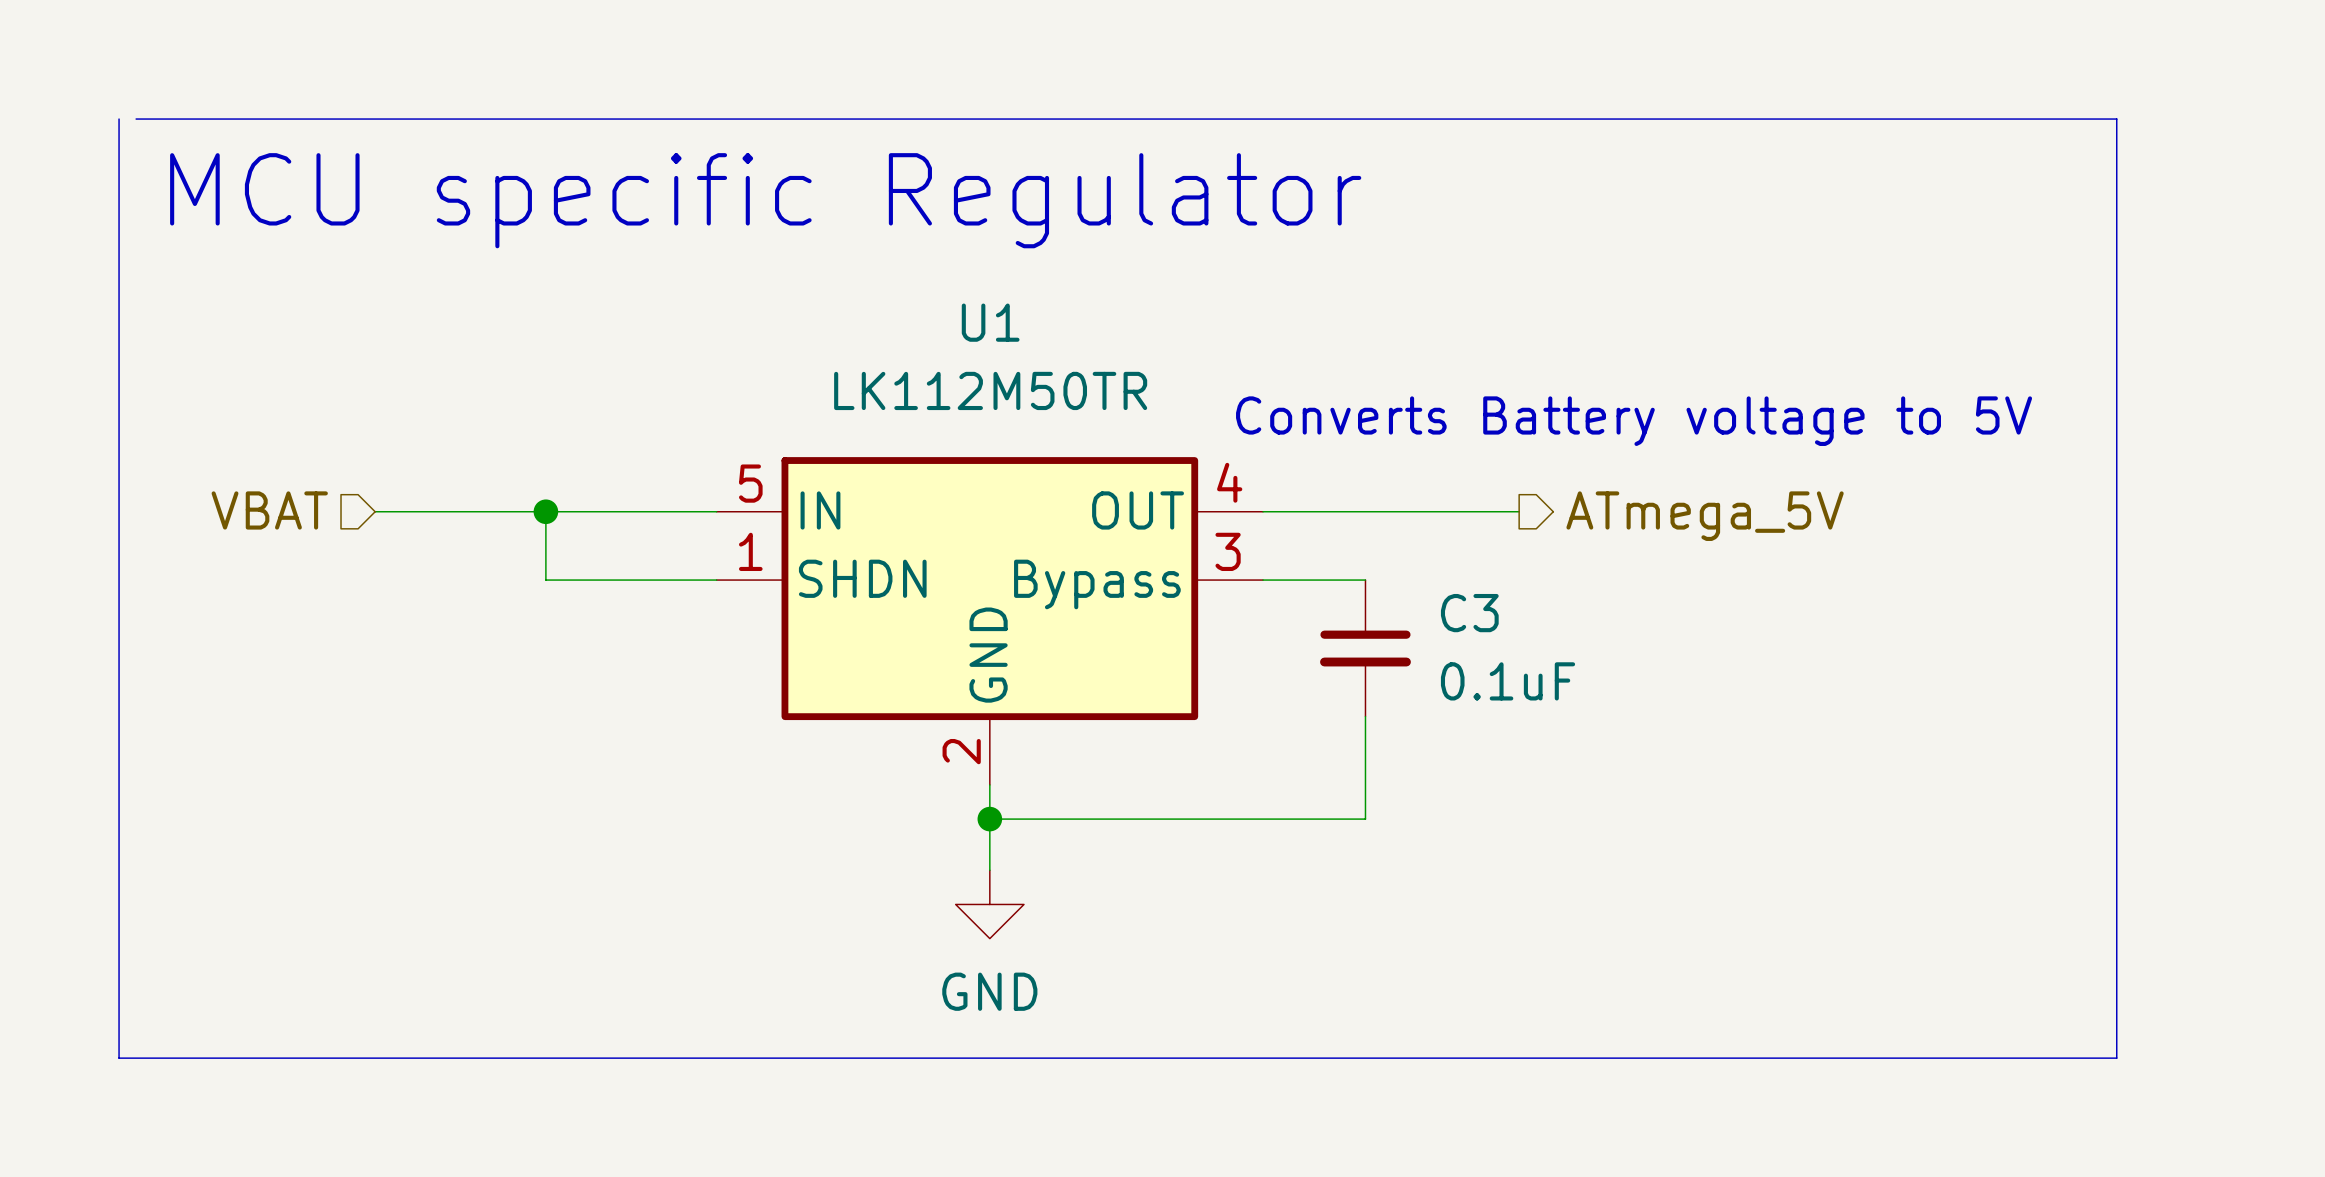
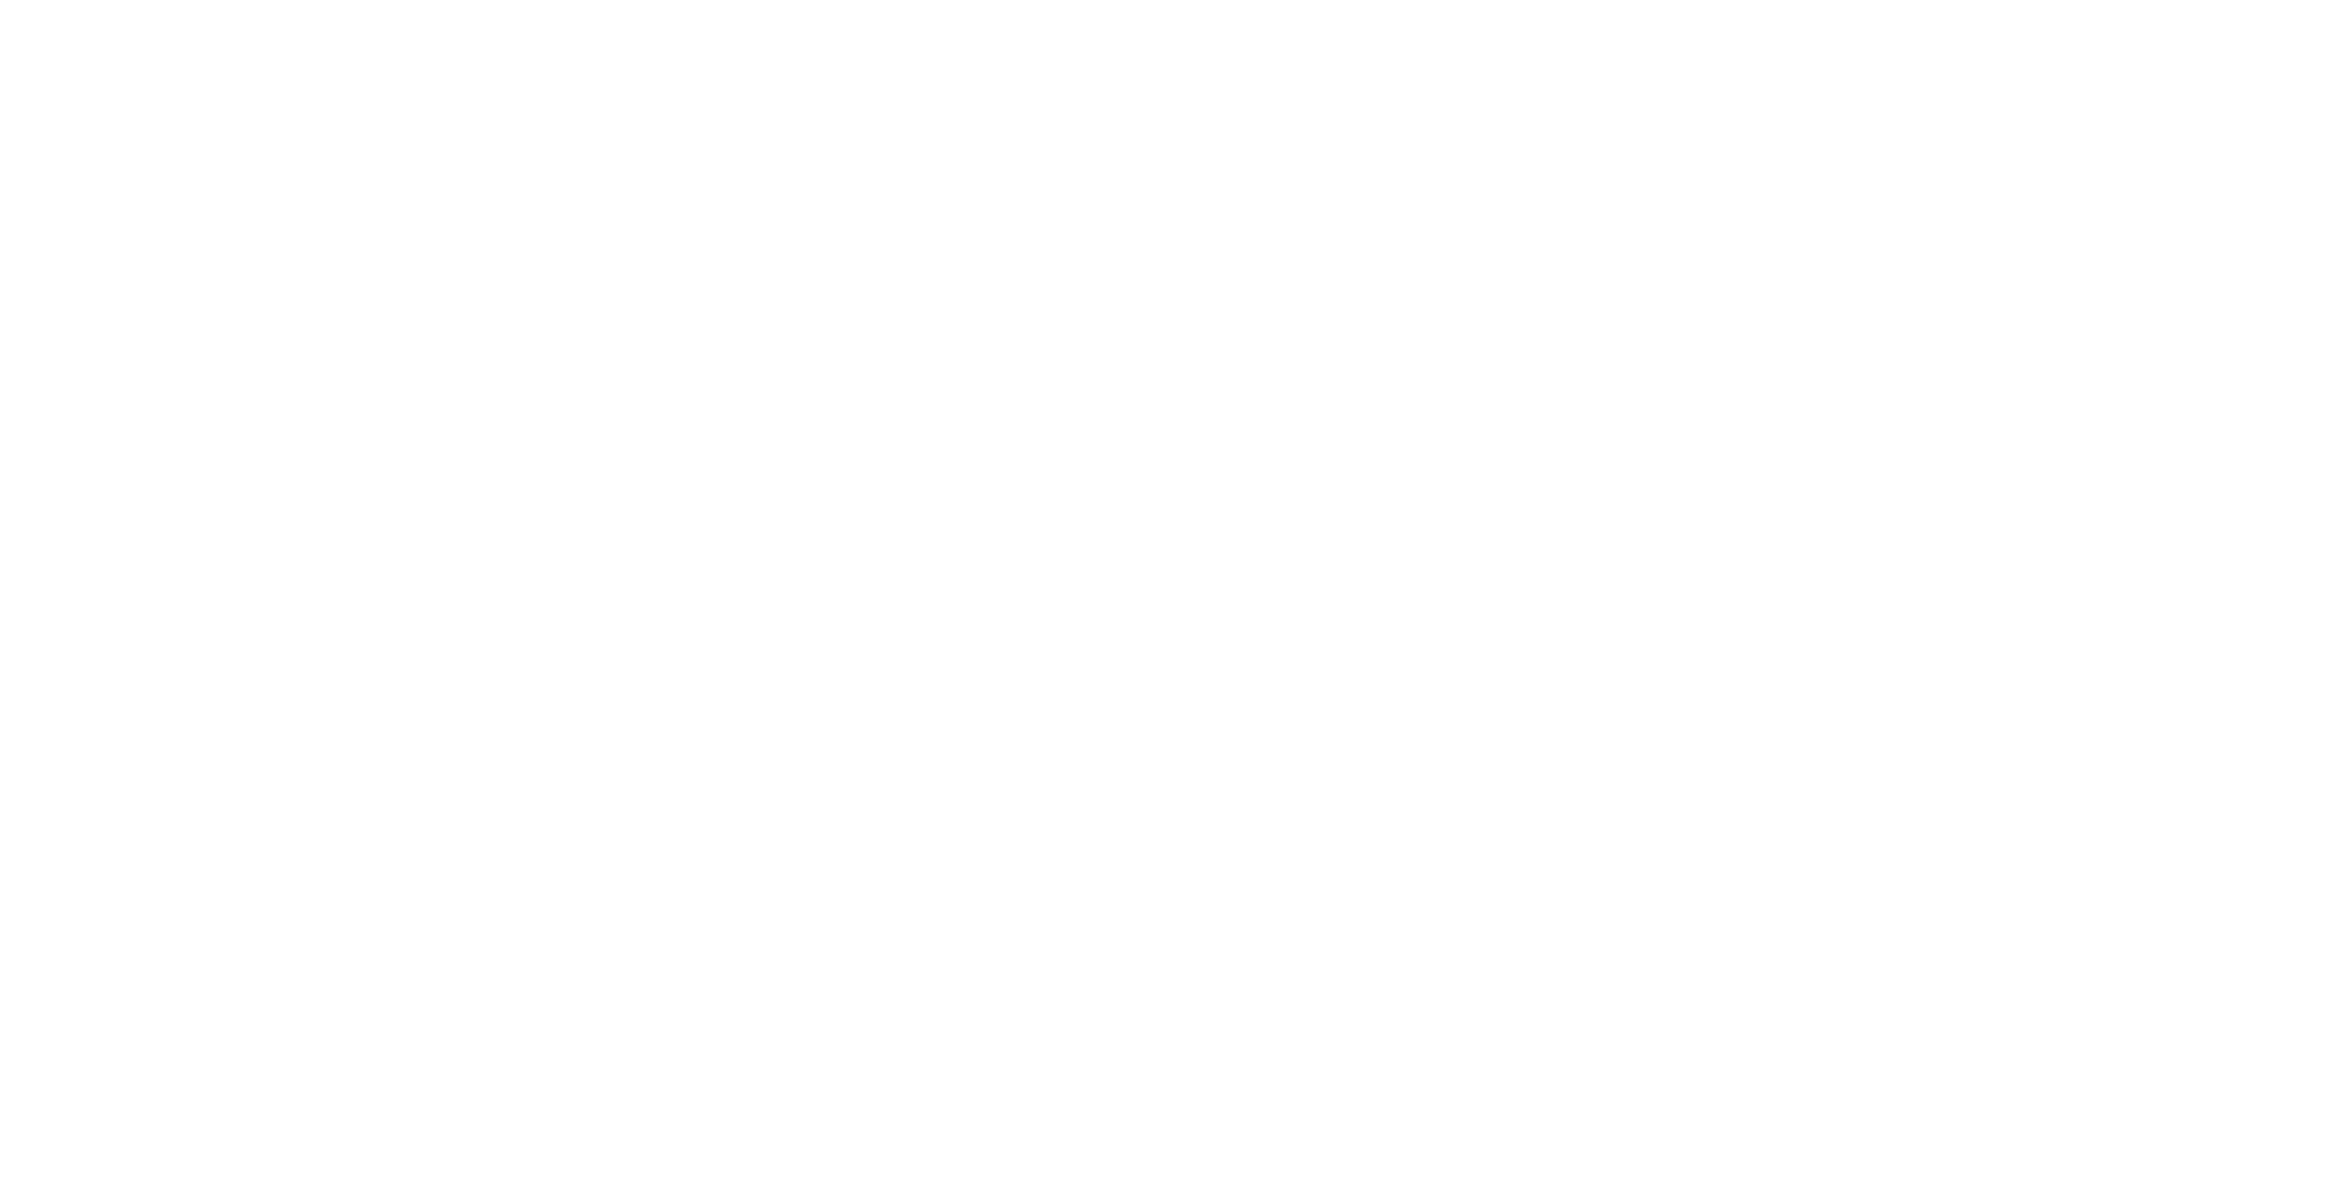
line: (119, 119) (119, 1058) (2116, 1058) (2116, 119) (136, 119) -> none
text: MCU specific Regulator (765, 200) -> none
text: Converts Battery voltage to 5V (1634, 421) -> none
hierarchical label: VBAT (269, 510) -> none
wire: (375, 511) (716, 511) -> none
wire: (545, 511) (545, 580) (716, 580) -> none
junction: (545, 511) -> none
wire: (1263, 511) (1519, 511) -> none
hierarchical label: ATmega_5V (1705, 516) -> none
wire: (1263, 580) (1365, 580) -> none
U1: LK112M50TR (989, 621) -> none
C3: 0.1uF (1365, 648) -> none
wire: (1365, 716) (1365, 819) (989, 819) -> none
wire: (989, 784) (989, 870) -> none
junction: (989, 819) -> none
power symbol: GND (989, 904) -> none

